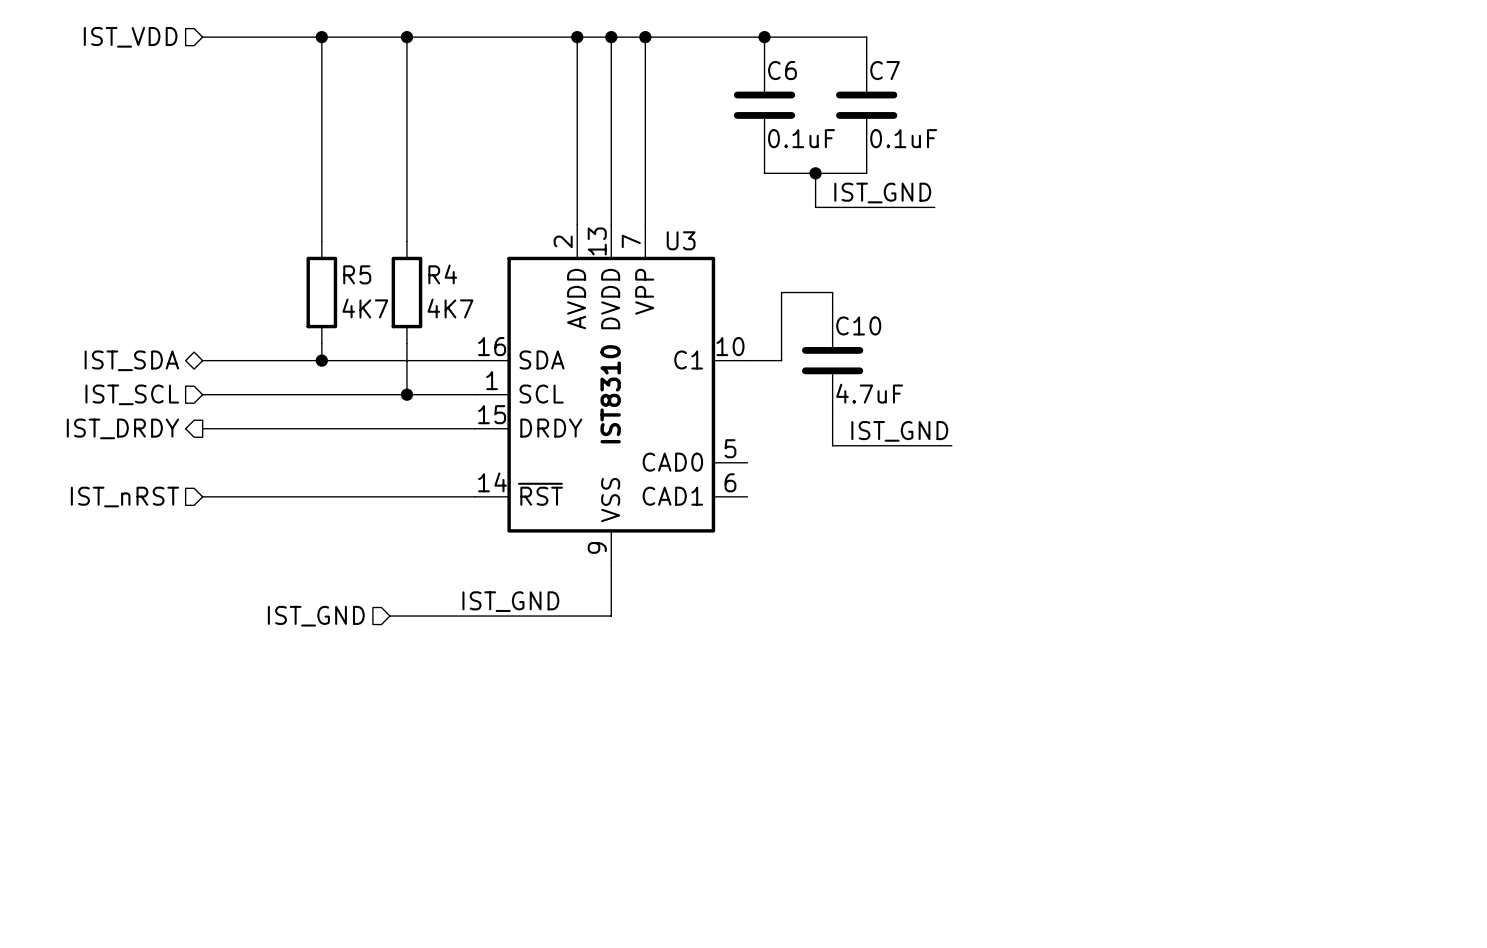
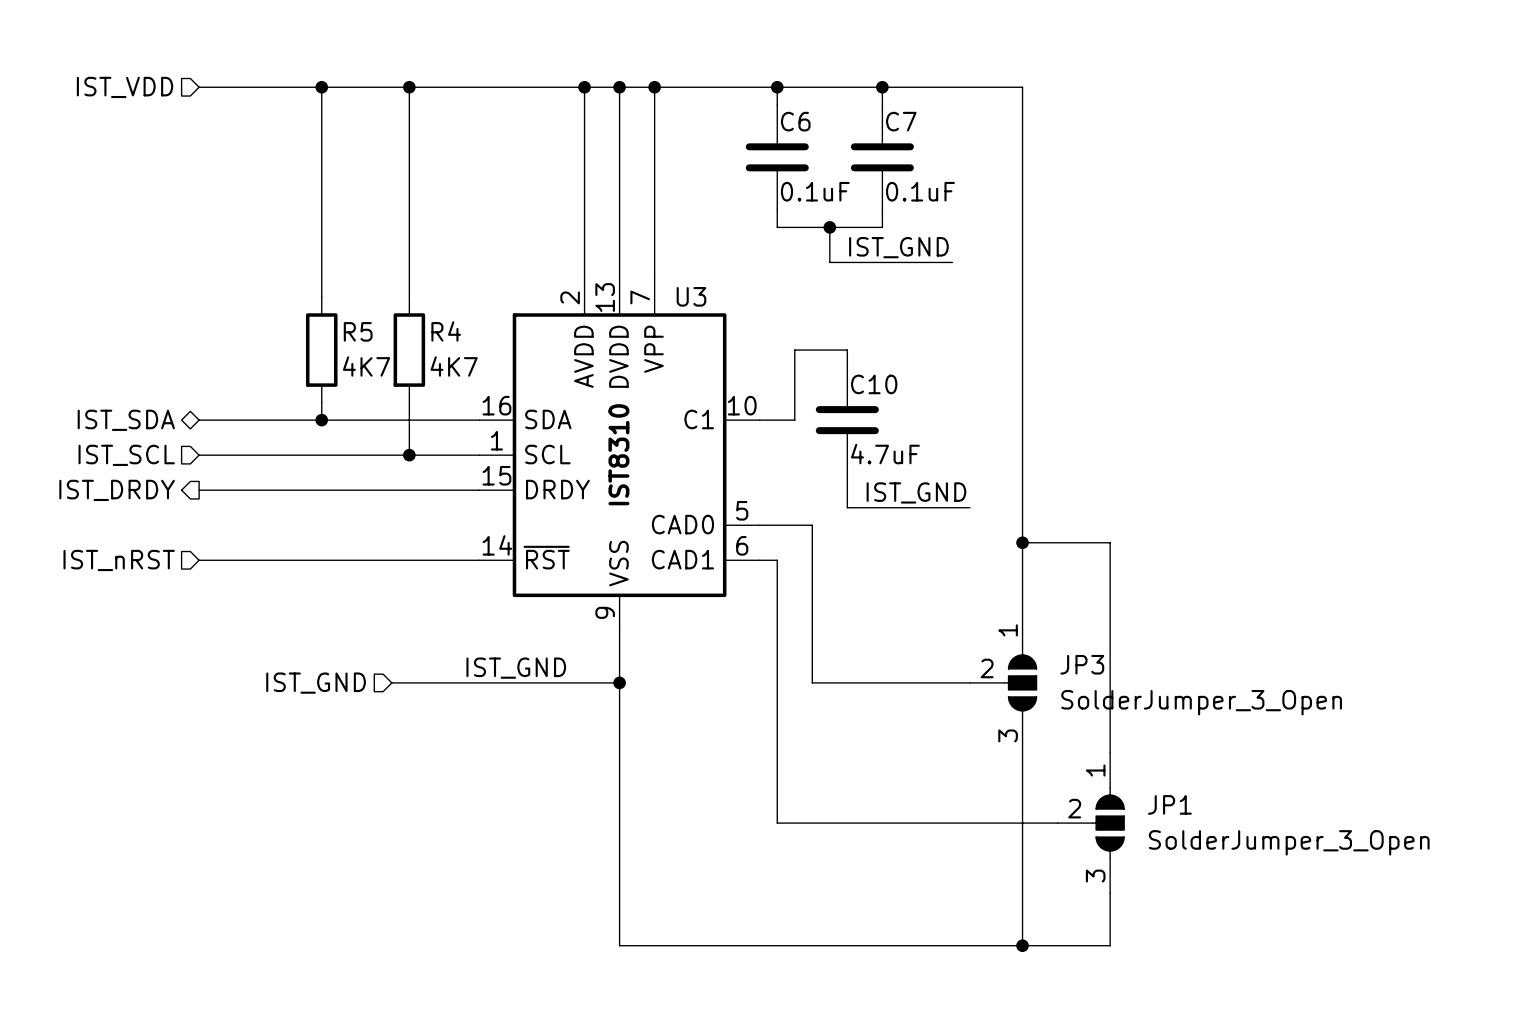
wire: none -> (882, 87) (1022, 87) (1022, 612)
junction: none -> (882, 87)
wire: none -> (759, 525) (812, 525) (812, 682) (969, 682)
wire: none -> (1022, 542) (1110, 542) (1110, 752)
junction: none -> (1022, 542)
wire: none -> (759, 560) (777, 560) (777, 823) (1057, 823)
wire: none -> (619, 682) (619, 945) (1110, 945) (1110, 893)
junction: none -> (619, 682)
JP3: none -> SolderJumper_3_Open (1003, 682)
wire: none -> (1022, 752) (1022, 945)
JP1: none -> SolderJumper_3_Open (1090, 823)
junction: none -> (1022, 945)

